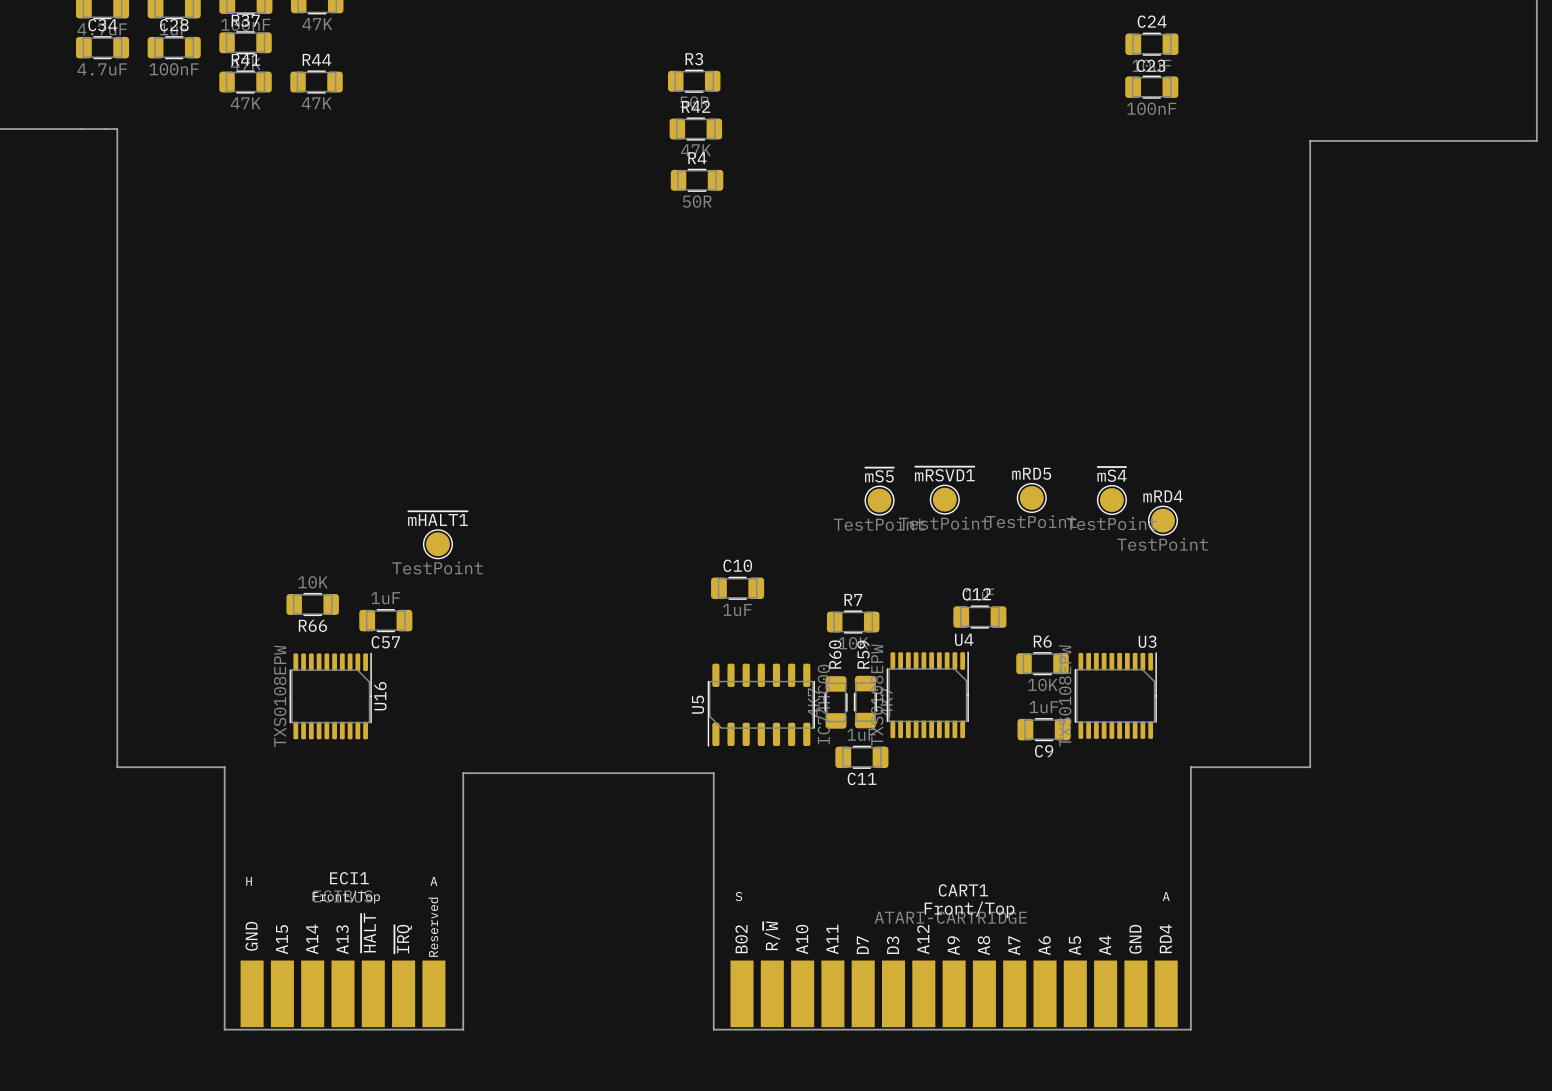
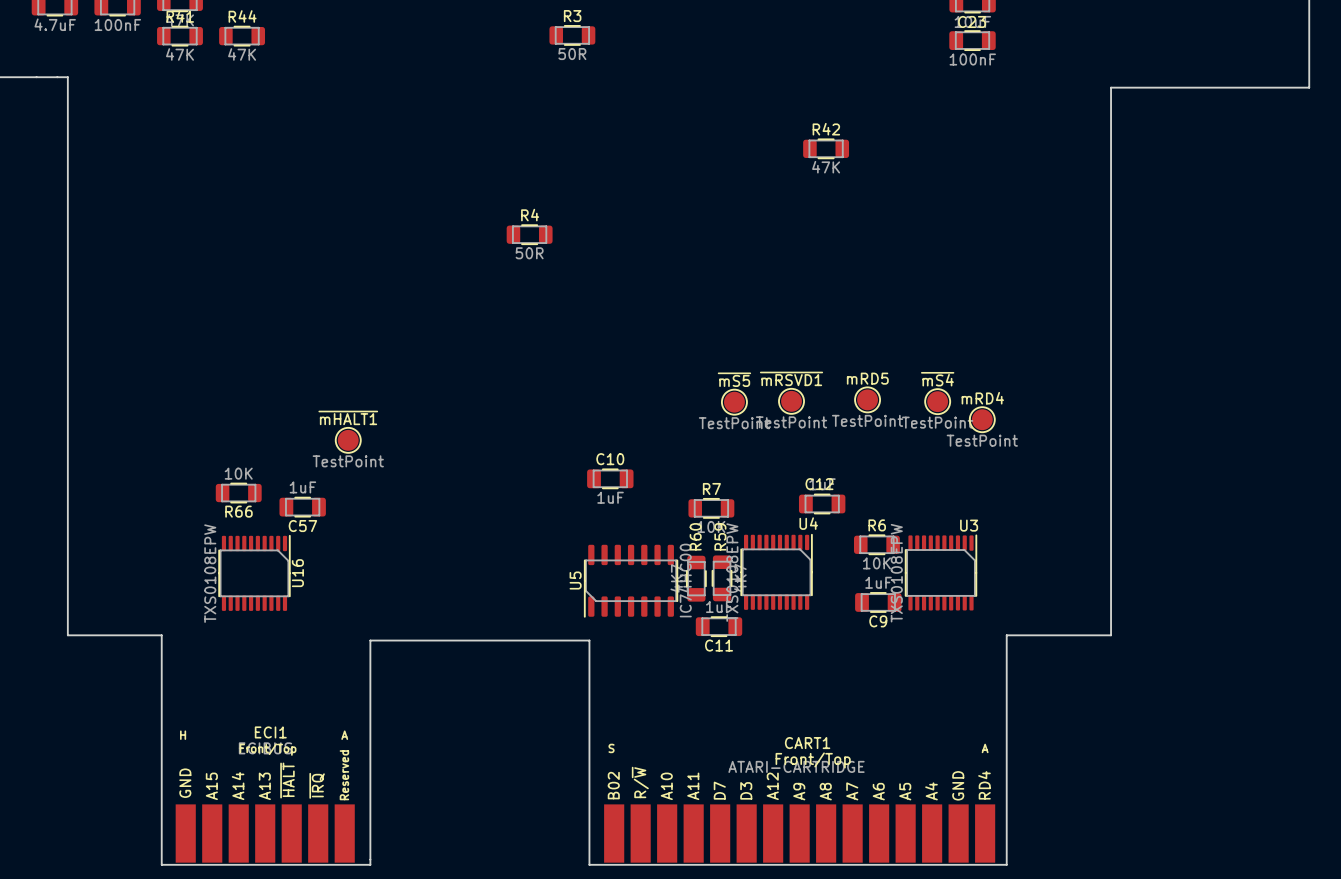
R42 position: (695, 129) -> (826, 148)
R4 position: (697, 180) -> (529, 234)

